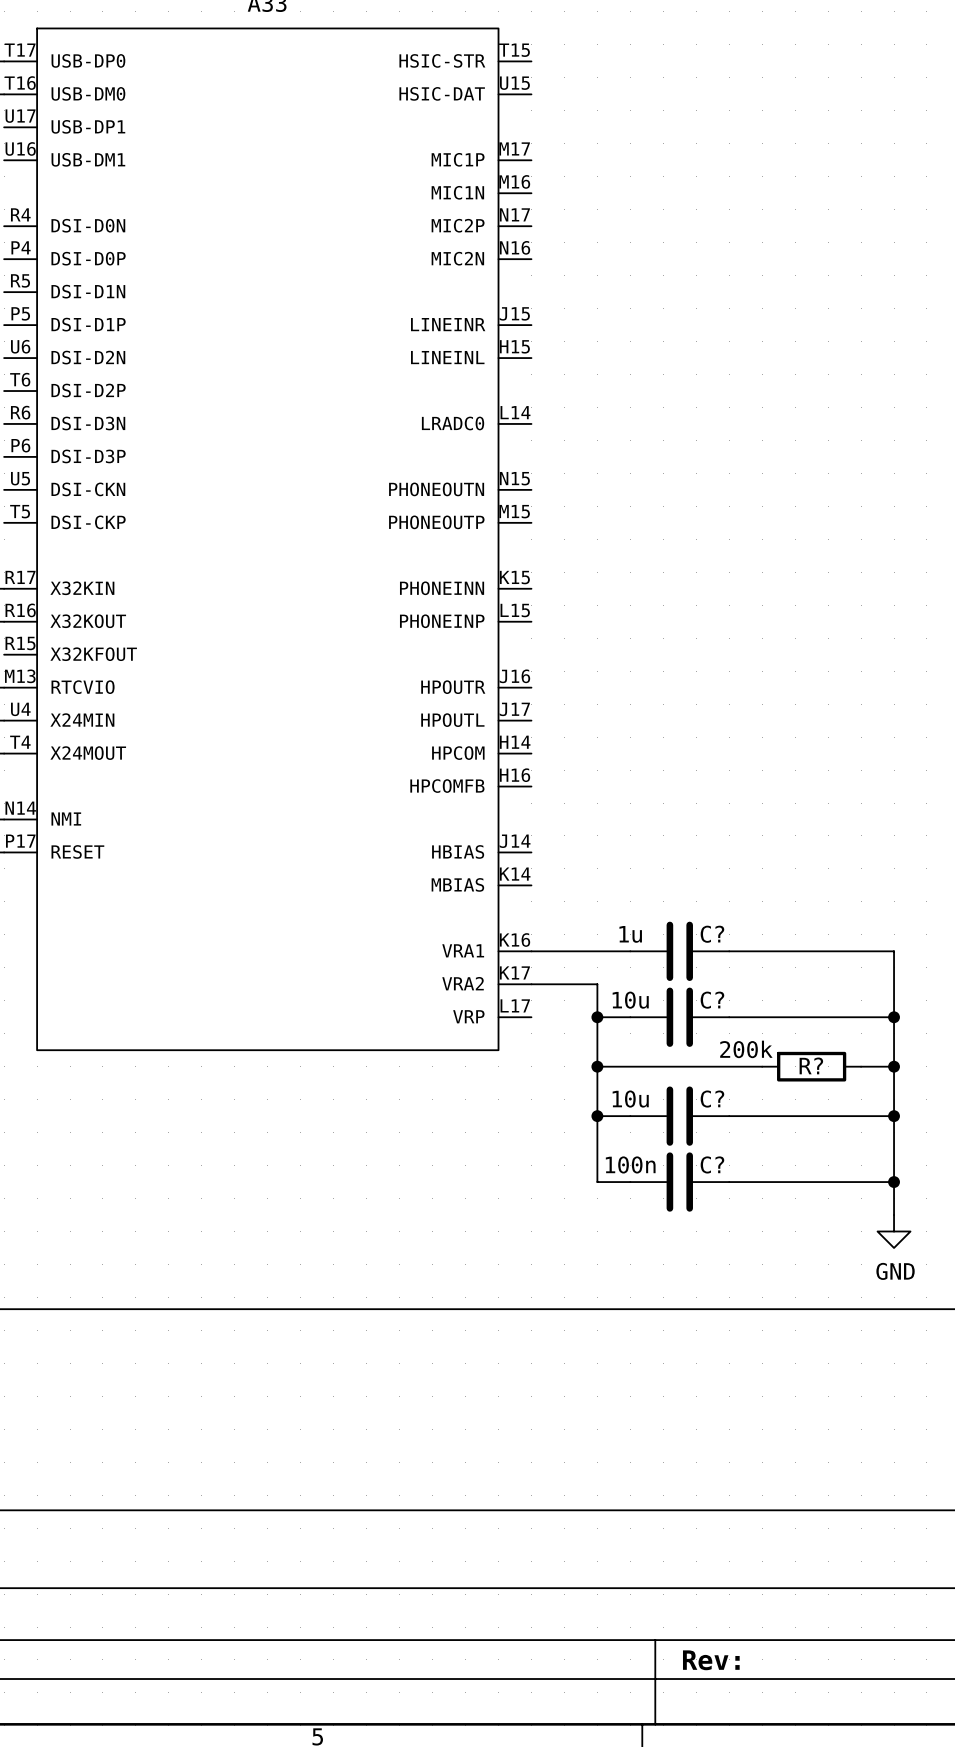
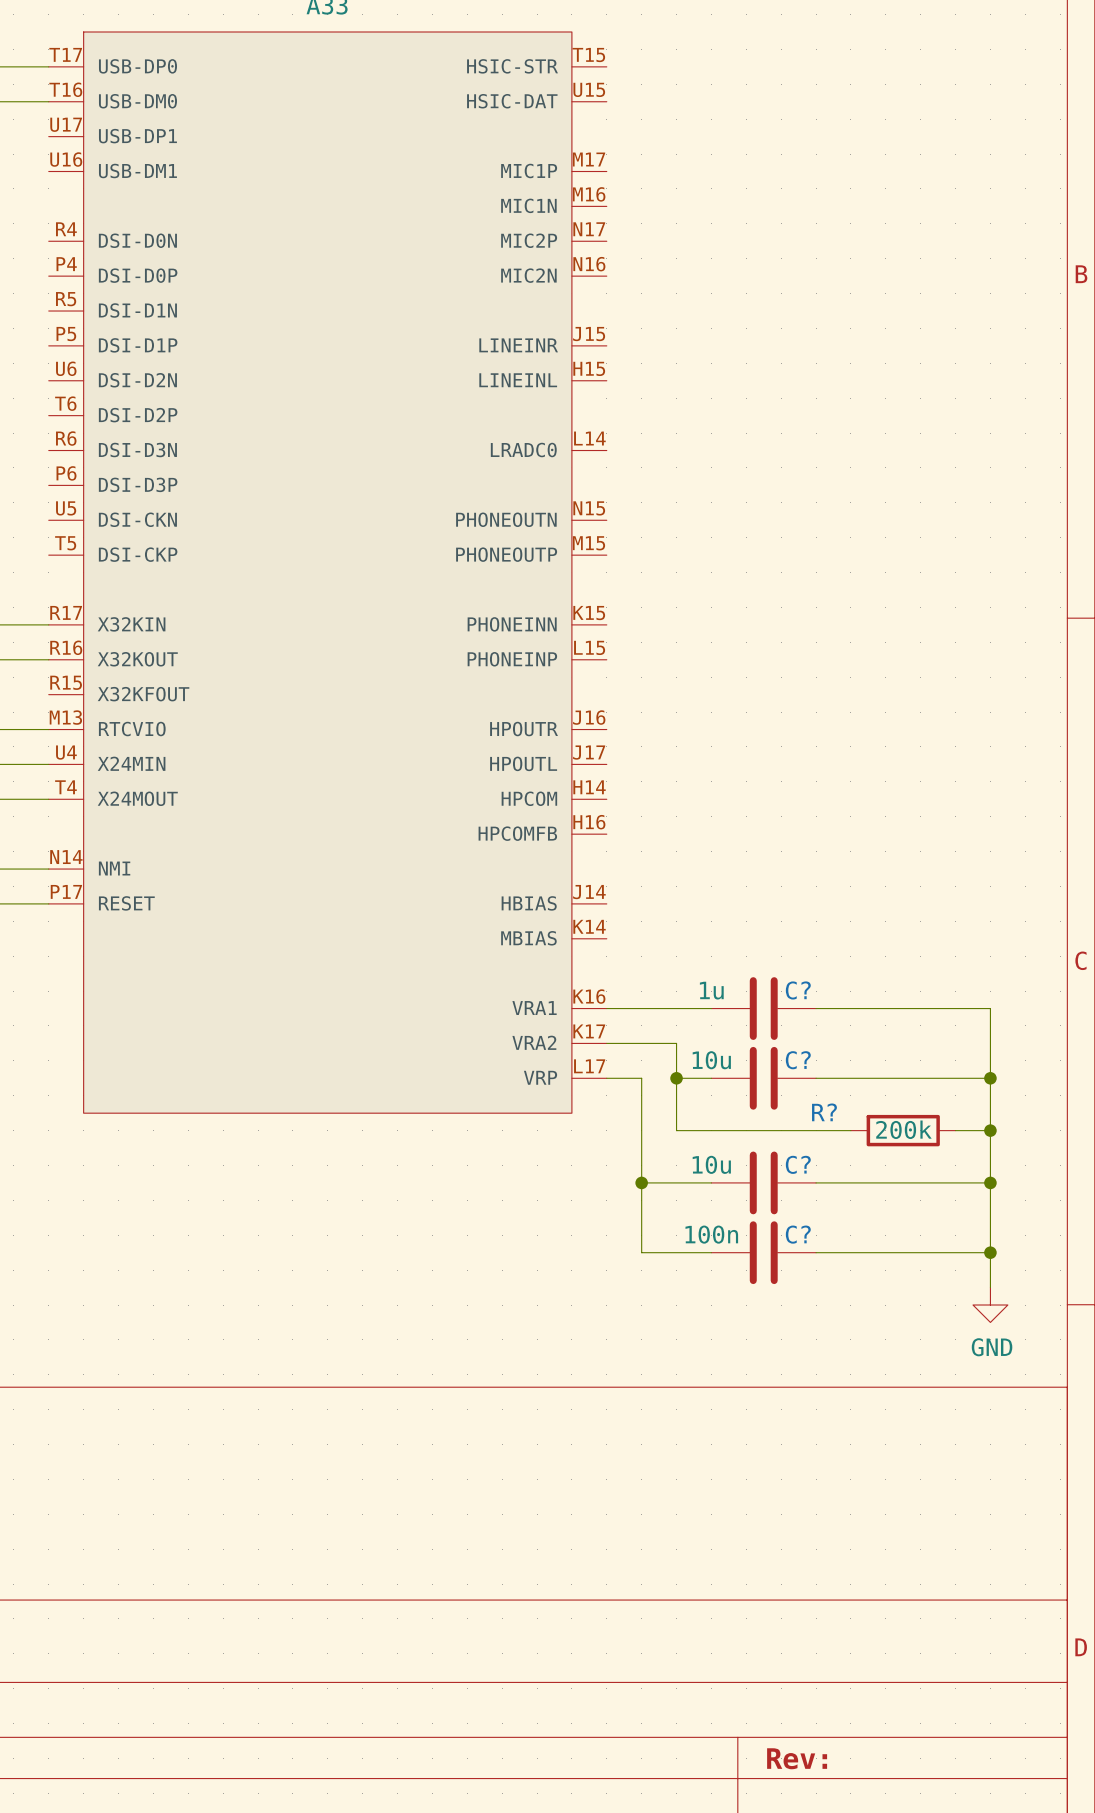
R? value position: 200k (746, 1049) -> 200k (903, 1129)
R? name position: R? (811, 1065) -> R? (824, 1112)
wire: (597, 1066) (597, 1182) -> (606, 1078) (641, 1078) (641, 1252) (676, 1252)
junction: (597, 1066) -> none
wire: none -> (641, 1182) (676, 1182)
junction: none -> (641, 1182)
junction: (597, 1116) -> none

